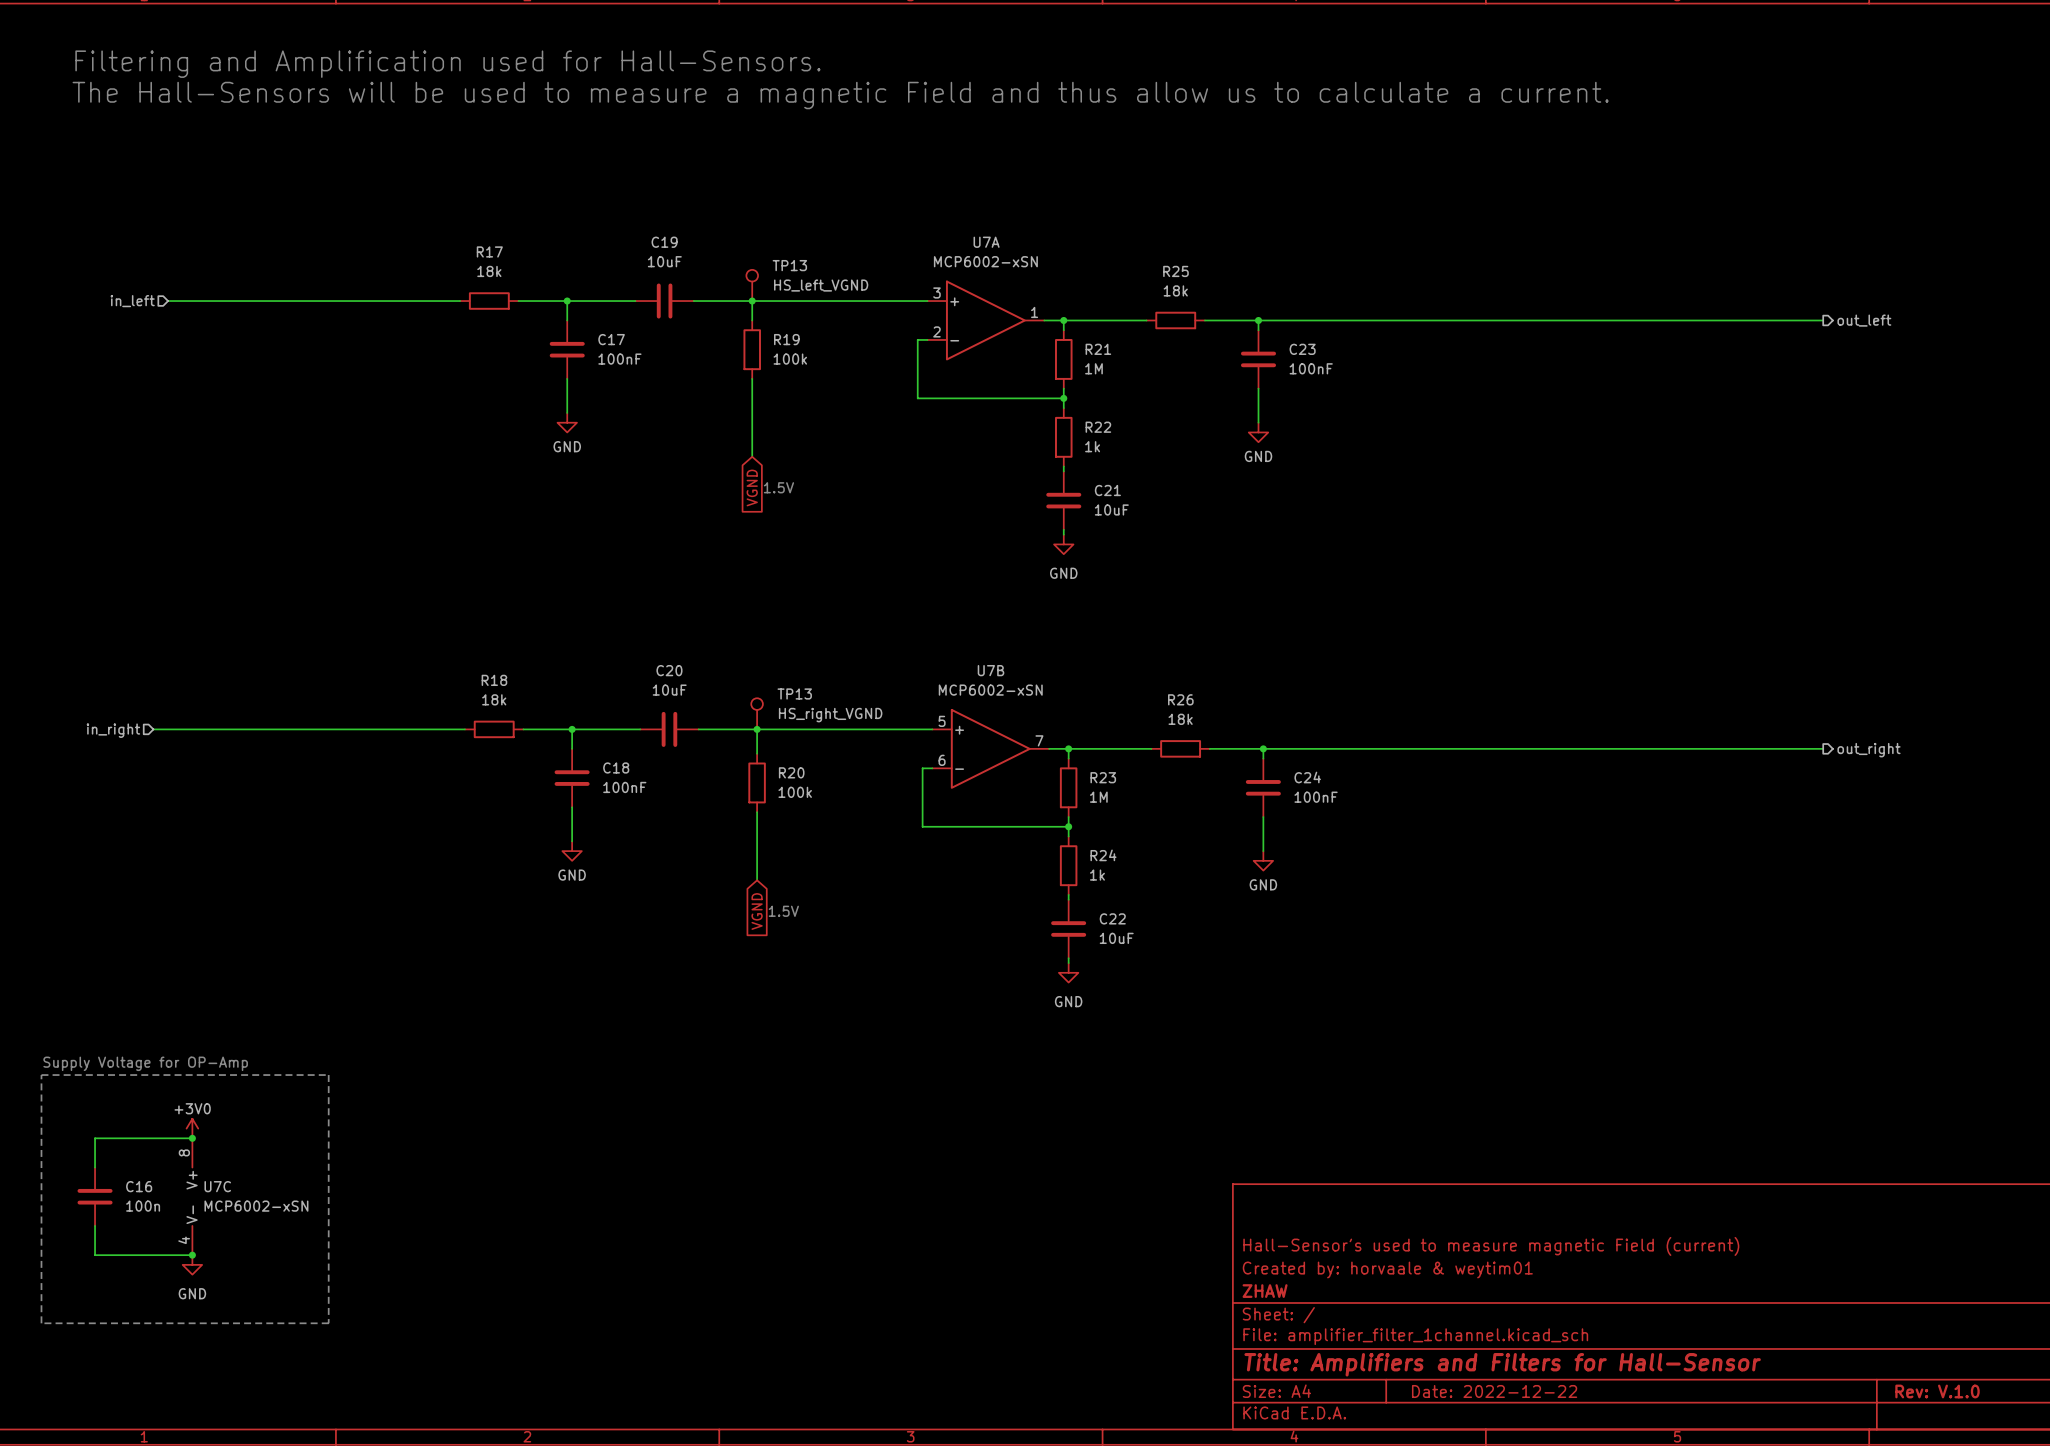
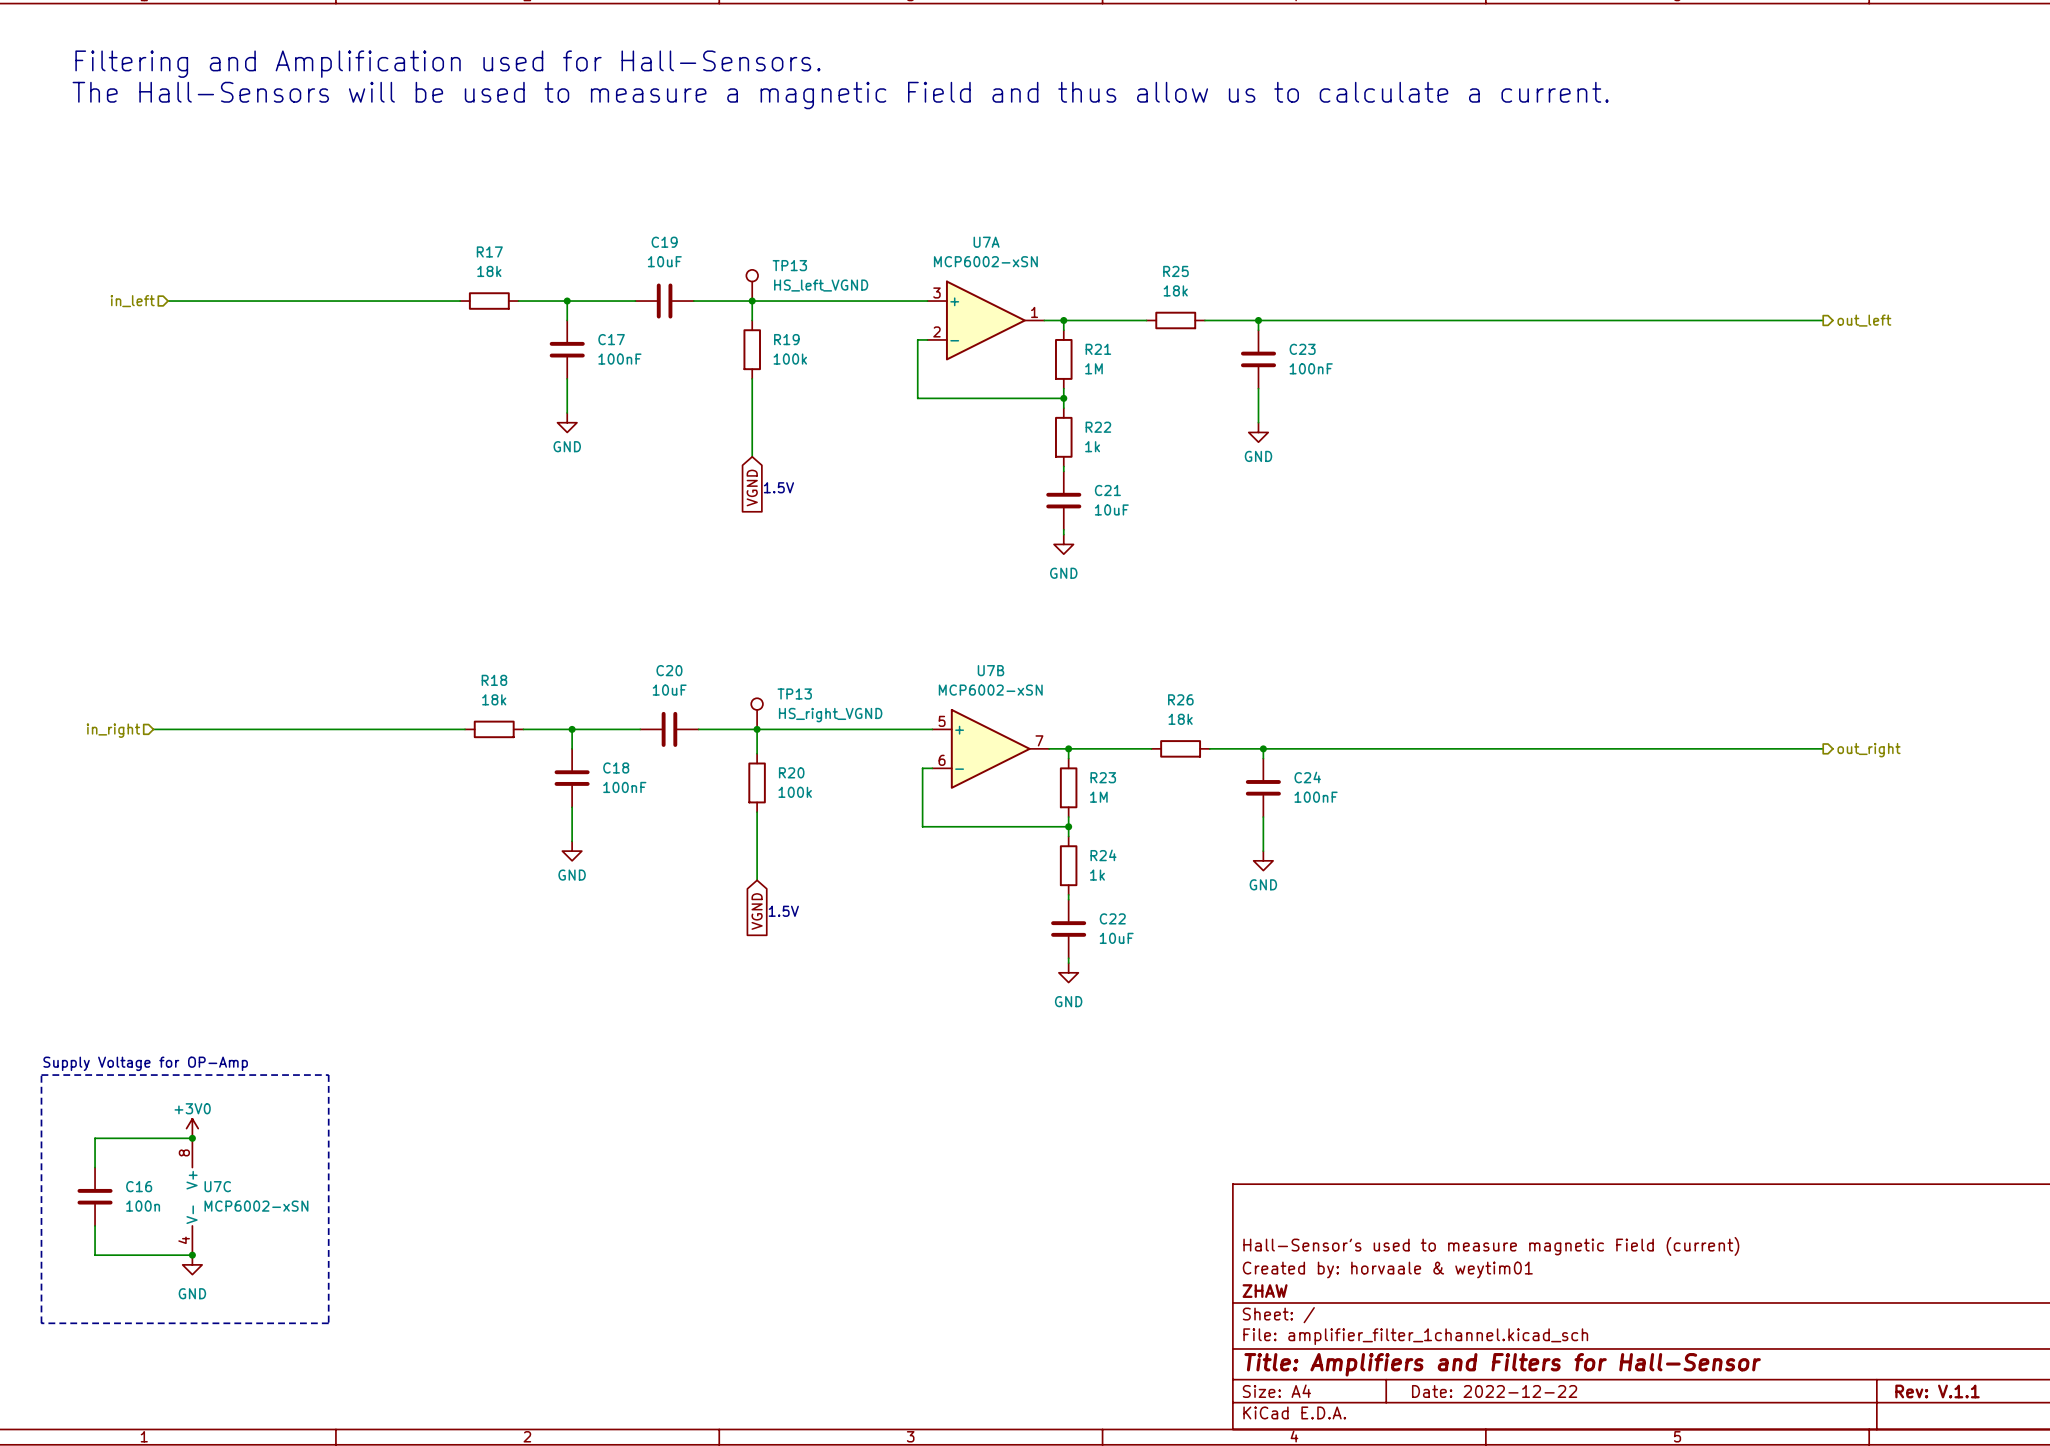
title block: Rev: V.1.0 (1937, 1391) -> Rev: V.1.1 (1937, 1391)

